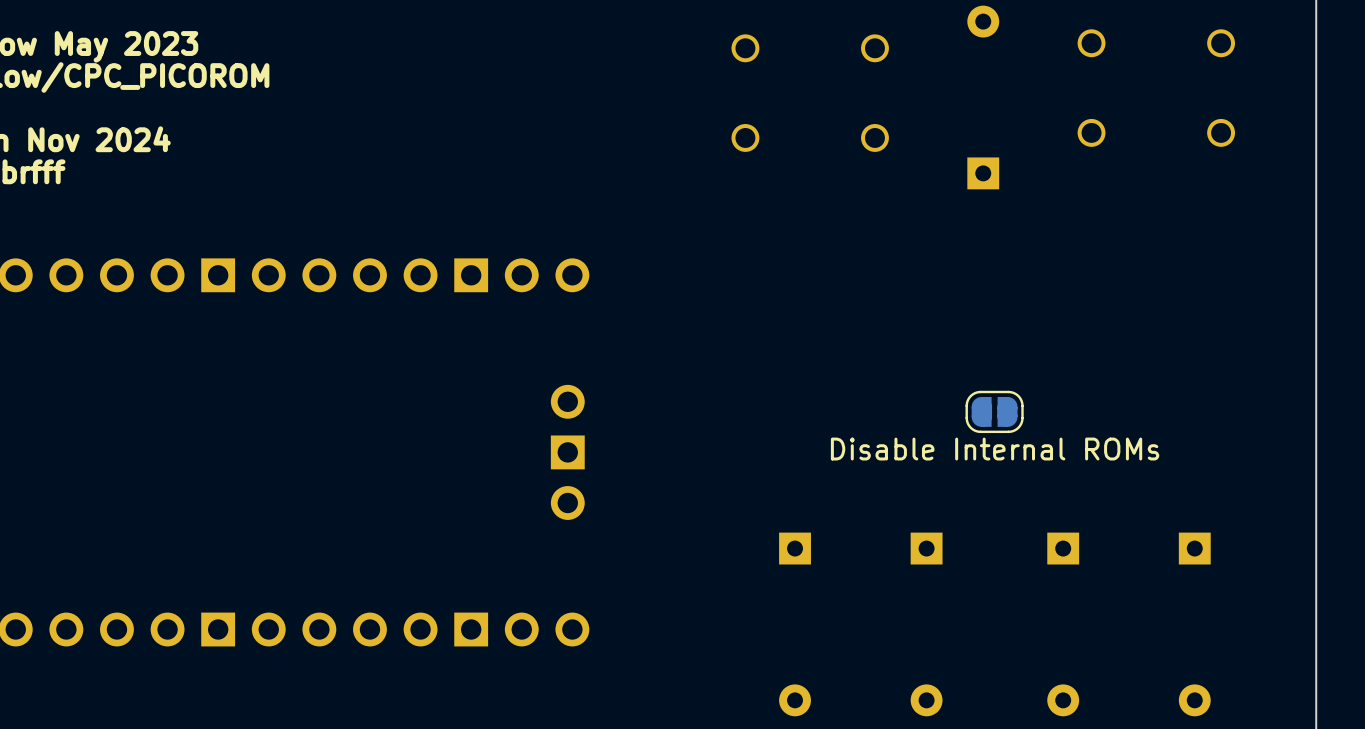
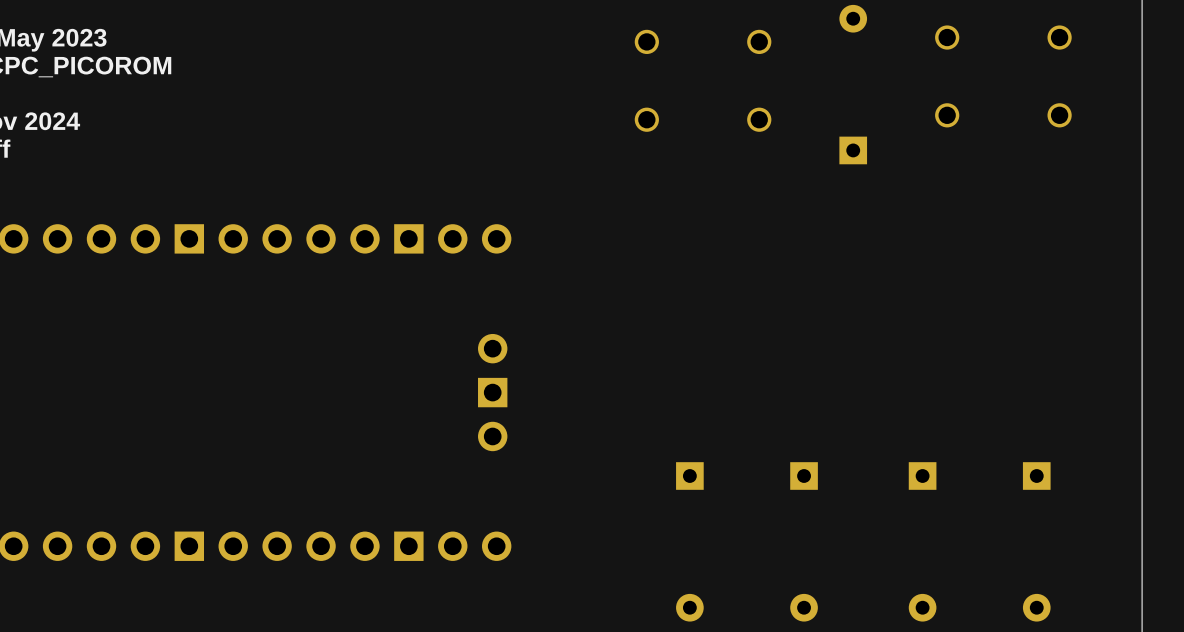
part: Disable Internal ROMs (994, 411) -> none

